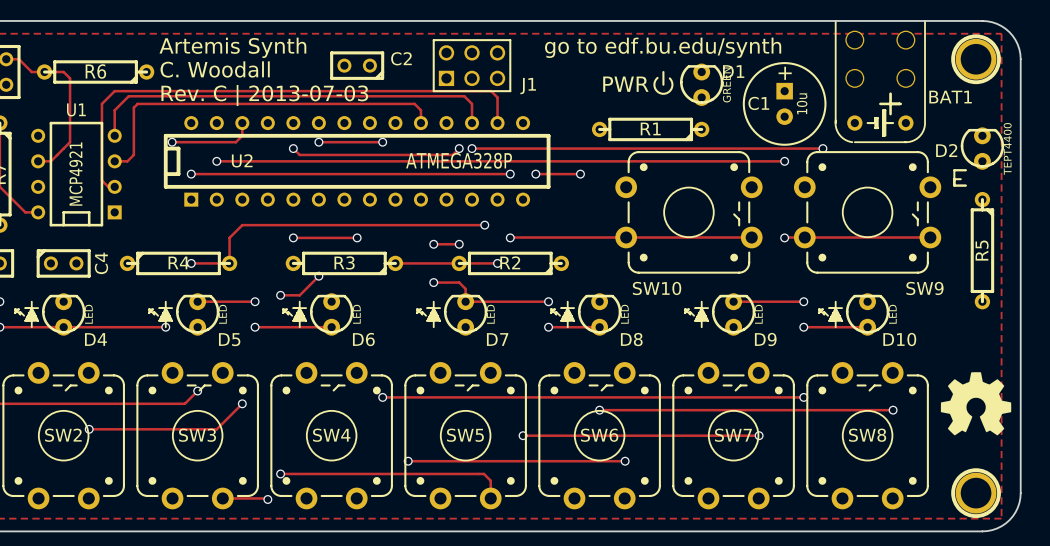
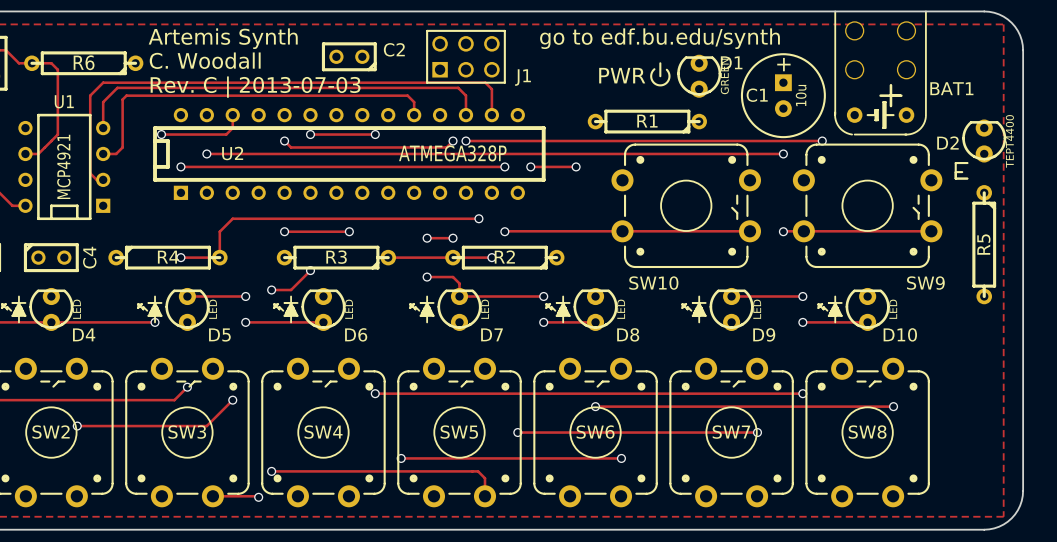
part: (976, 59) -> none
drawing: [940, 372, 1012, 436] -> none
part: (976, 493) -> none

